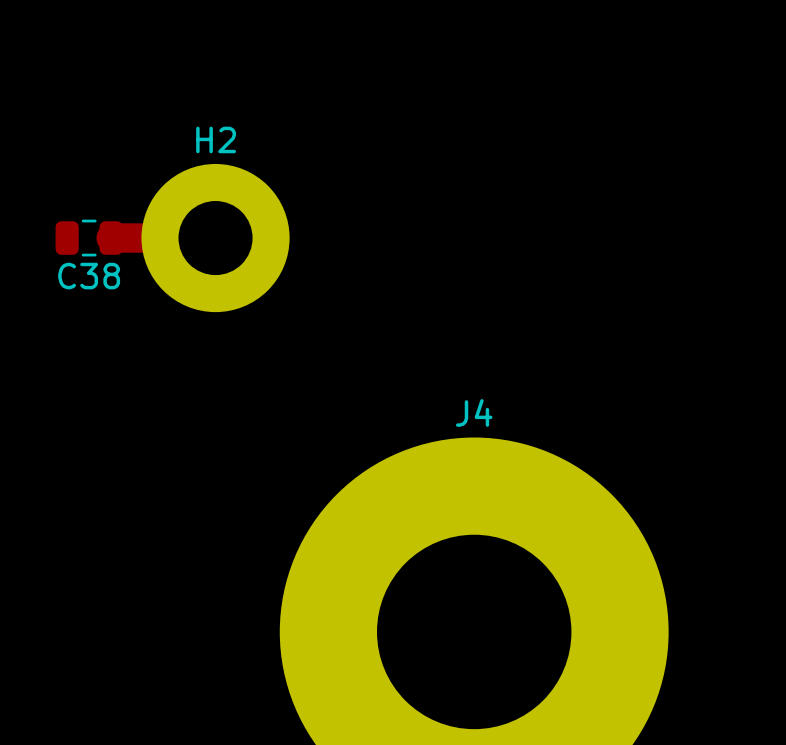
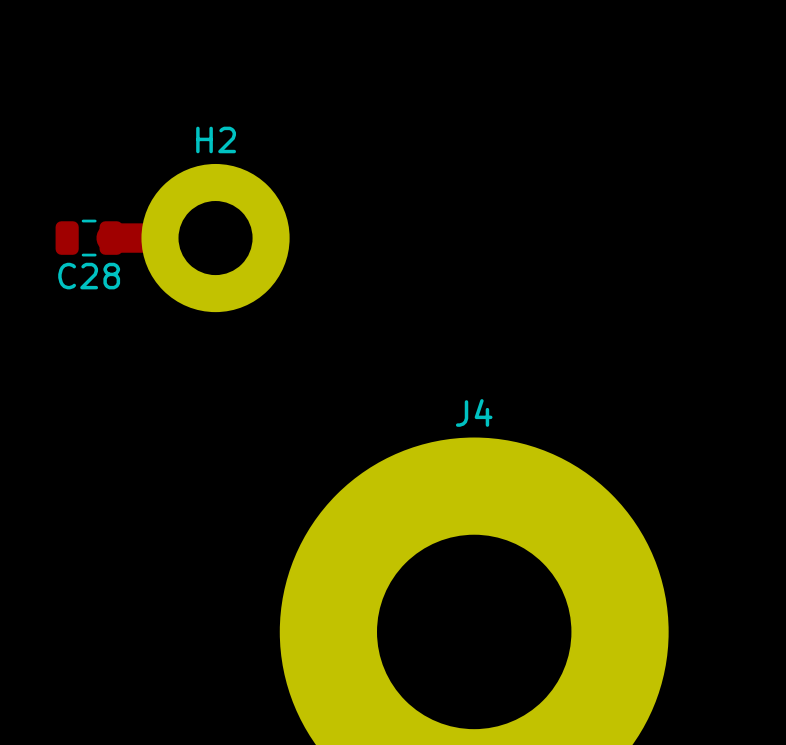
C38 name: C38 (89, 276) -> C28 (89, 276)

